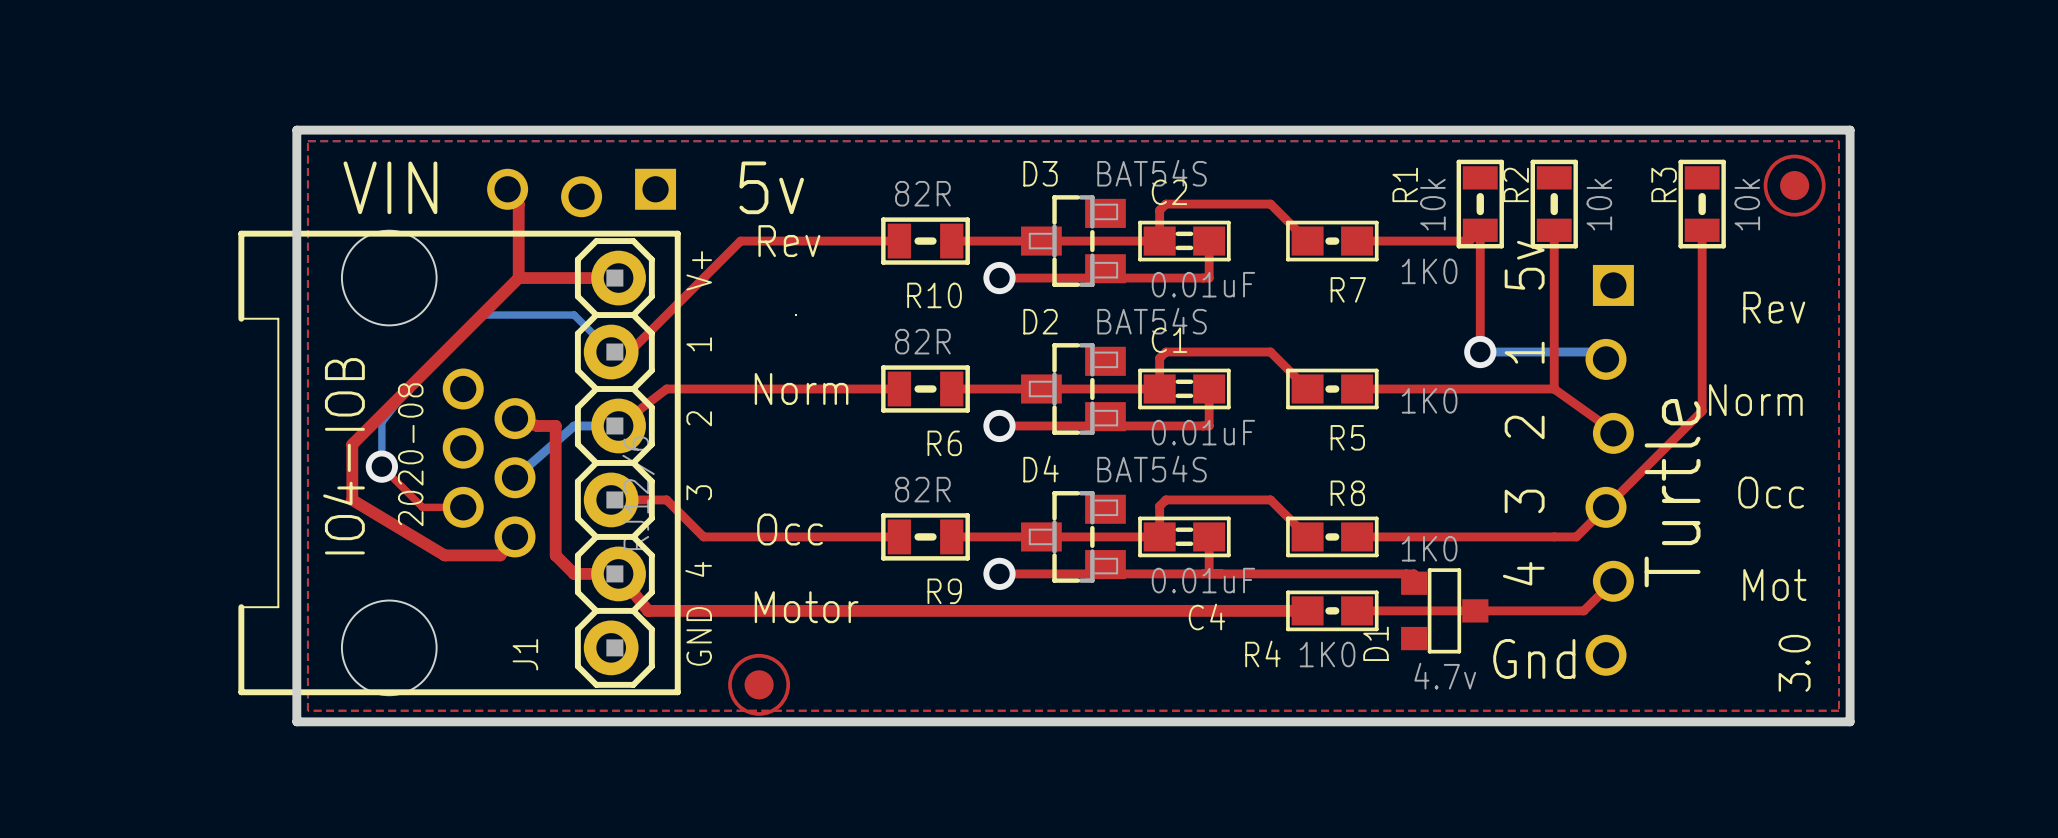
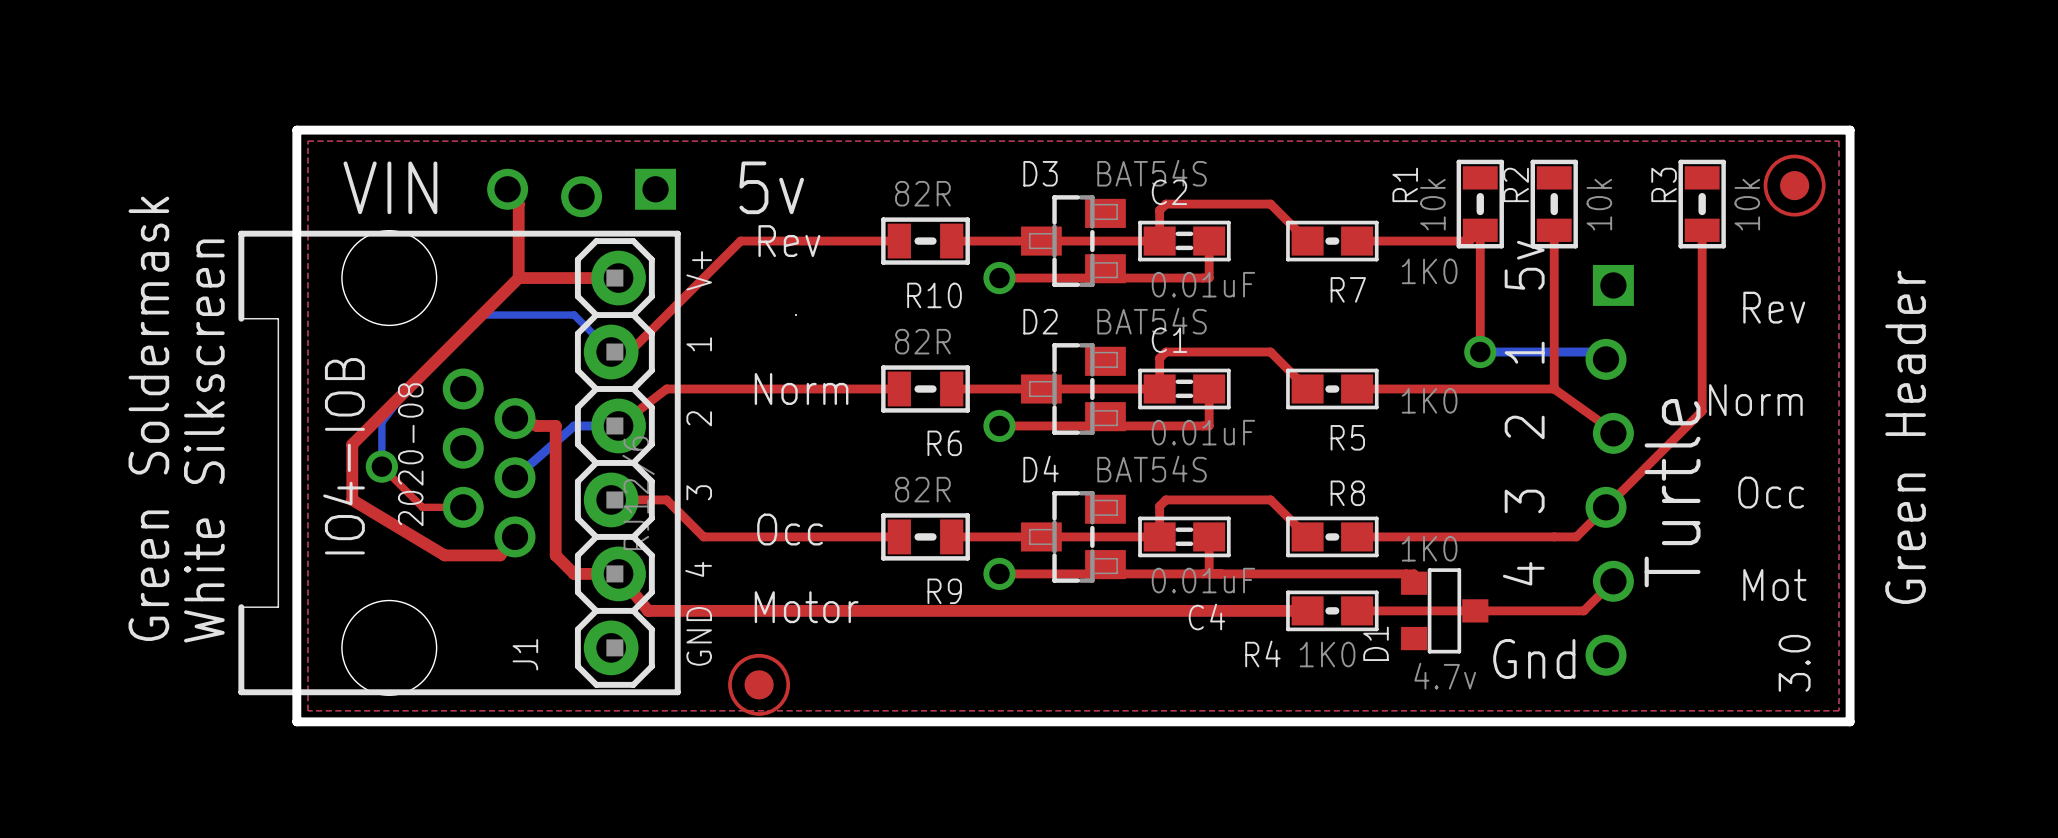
text: none -> Green Soldermask (148, 418)
text: none -> Green Header (1905, 437)
text: none -> White Silkscreen (204, 440)

